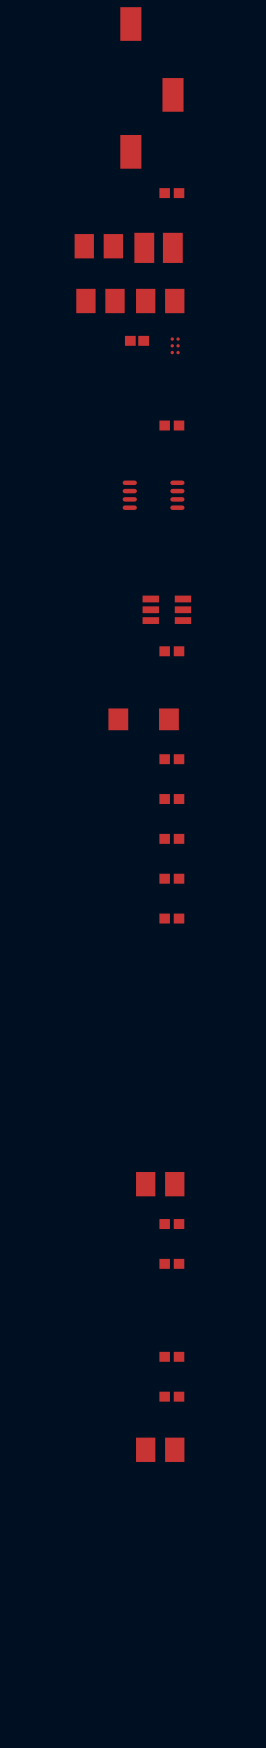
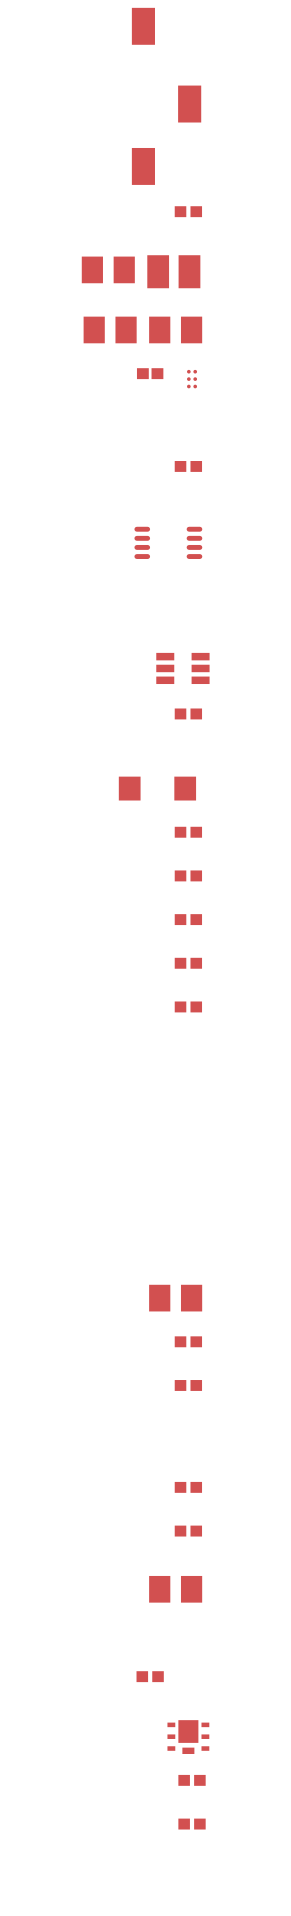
part: none -> (150, 1676)
part: none -> (188, 1737)
part: none -> (192, 1780)
part: none -> (192, 1824)

